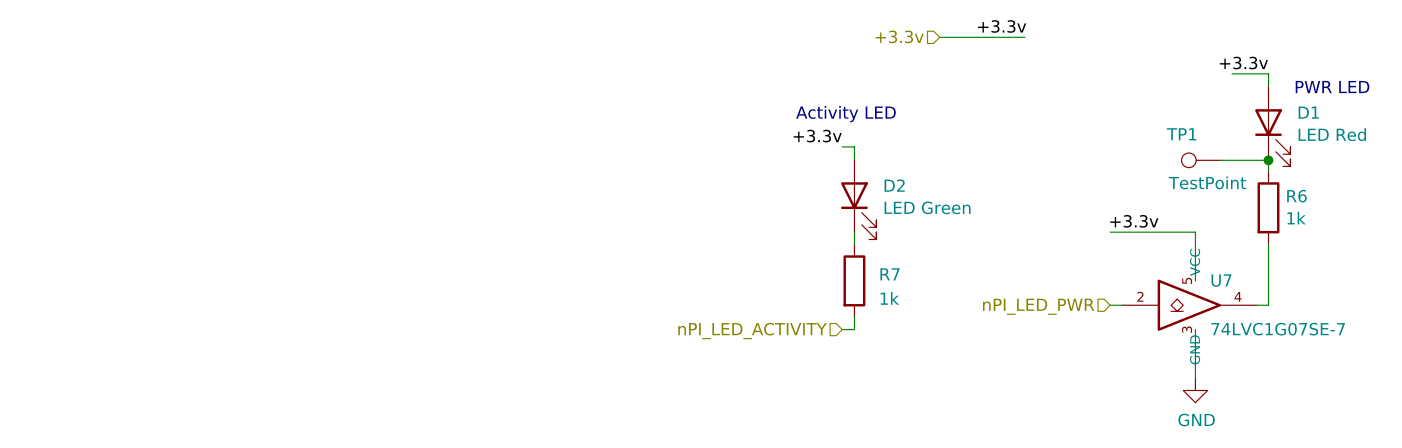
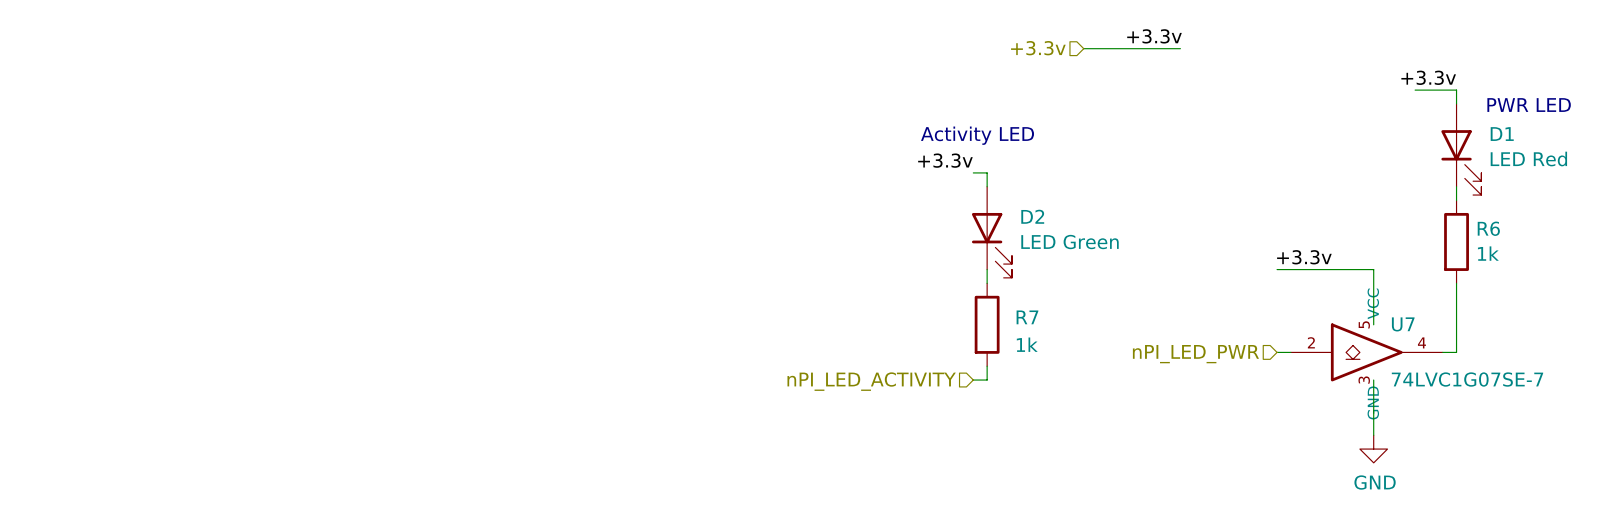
TP1: TestPoint (1201, 160) -> none
wire: (1220, 160) (1268, 160) -> none
junction: (1268, 160) -> none

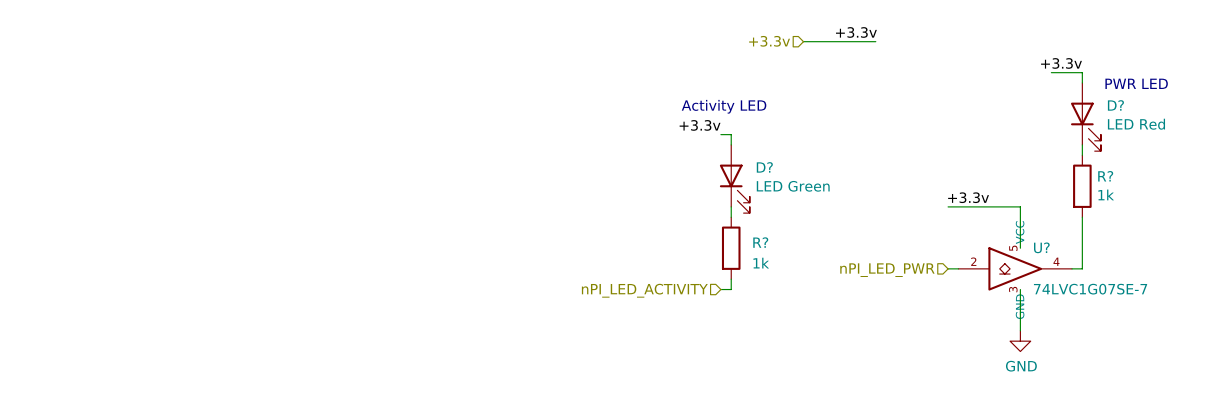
D1 name: D1 (1502, 134) -> D? (1115, 105)
D2 name: D2 (1032, 216) -> D? (764, 167)
R6 name: R6 (1488, 228) -> R? (1105, 176)
R7 name: R7 (1027, 317) -> R? (760, 242)
U7 name: U7 (1403, 324) -> U? (1041, 247)

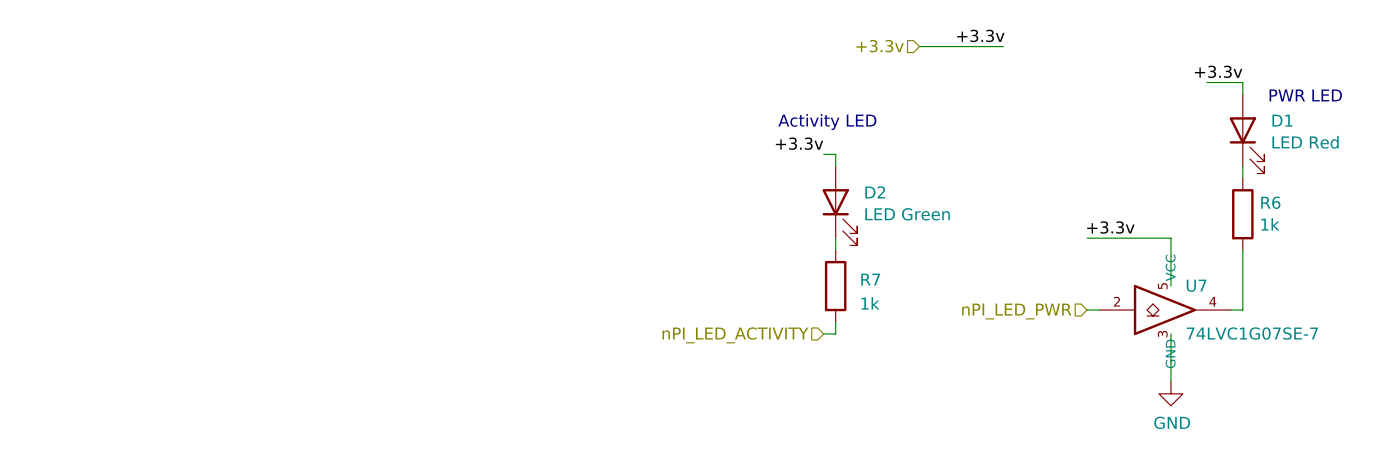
D? name: D? (1115, 105) -> D1 (1282, 120)
D? name: D? (764, 167) -> D2 (875, 192)
R? name: R? (1105, 176) -> R6 (1270, 202)
R? name: R? (760, 242) -> R7 (870, 279)
U? name: U? (1041, 247) -> U7 (1196, 285)

